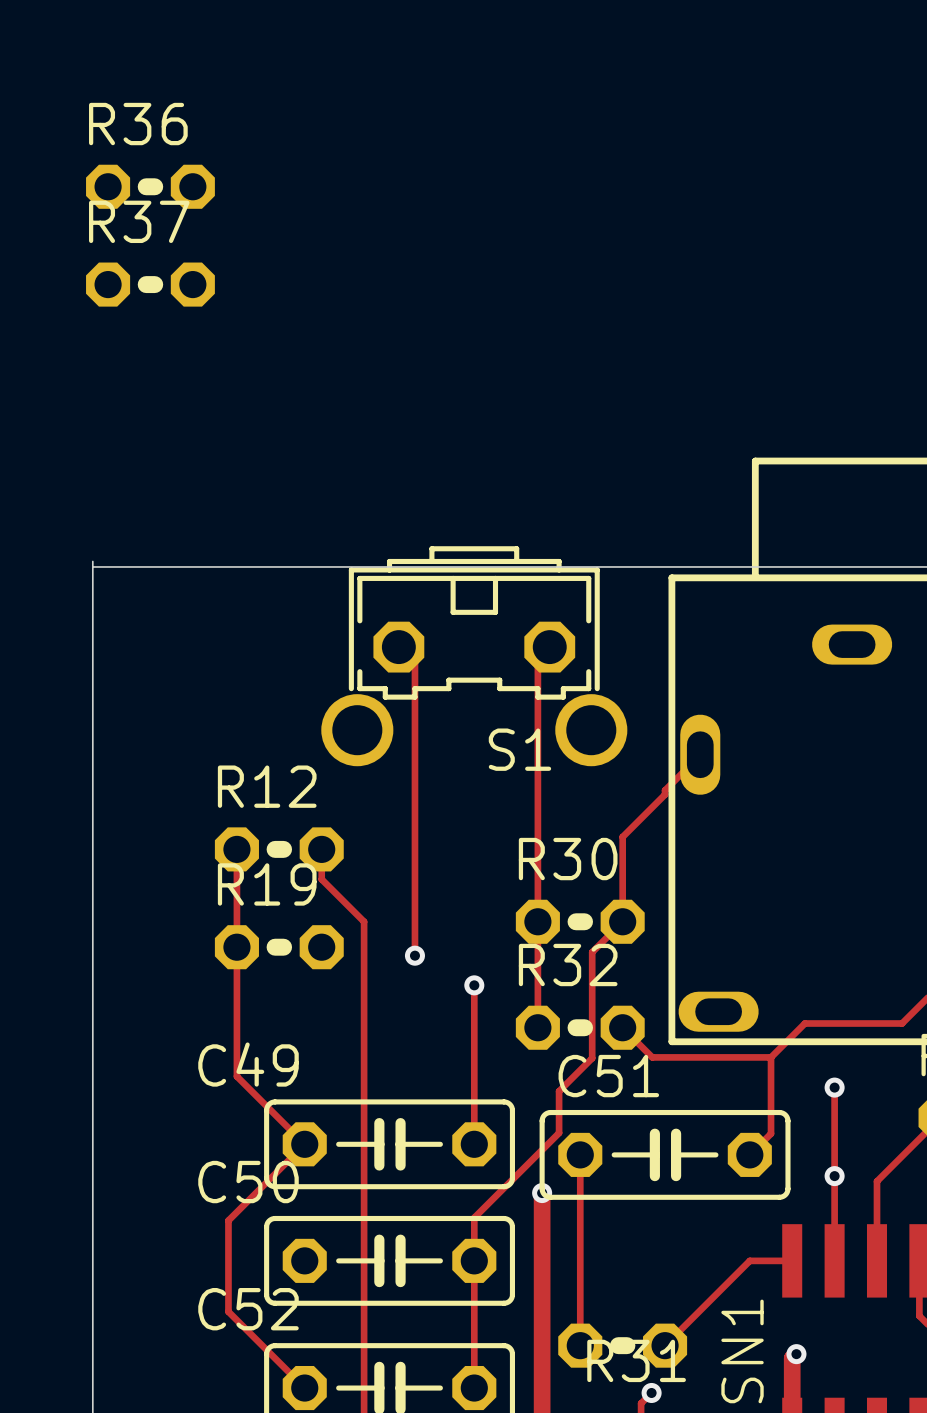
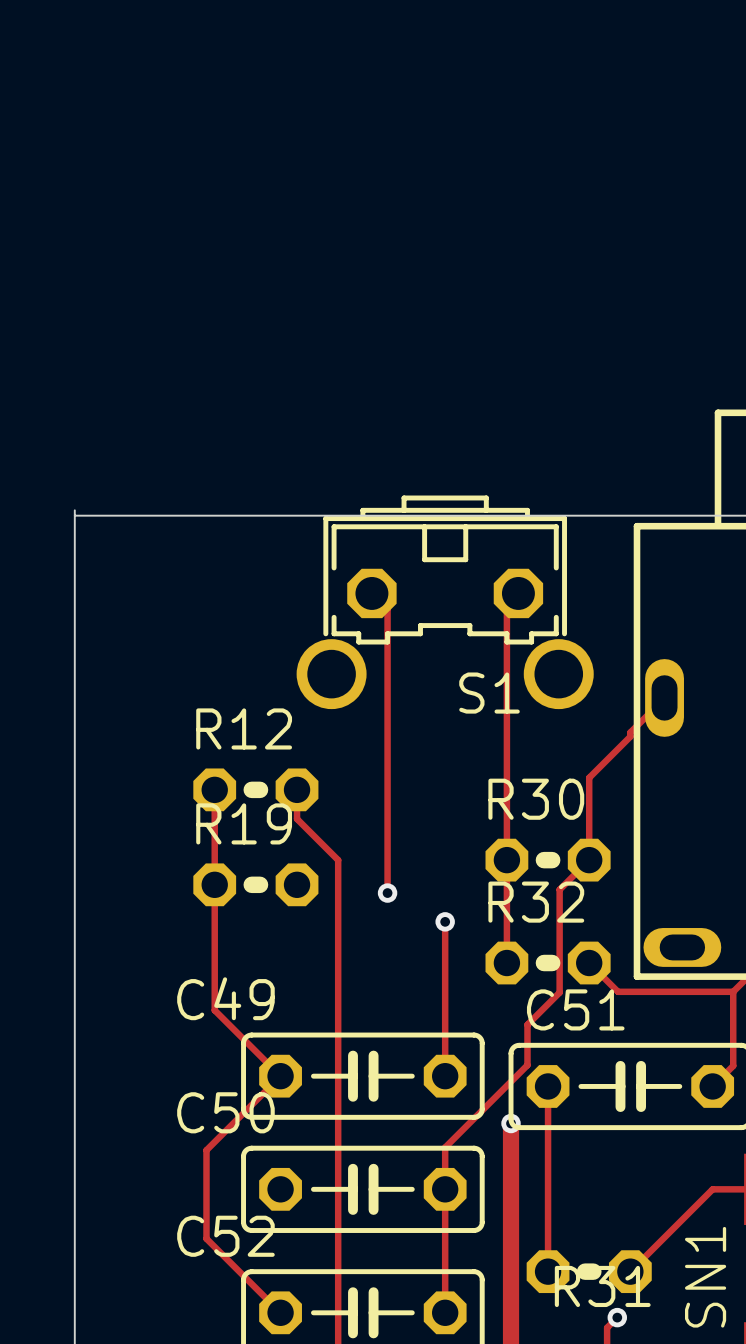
R36: (150, 186) -> none
R37: (150, 284) -> none

